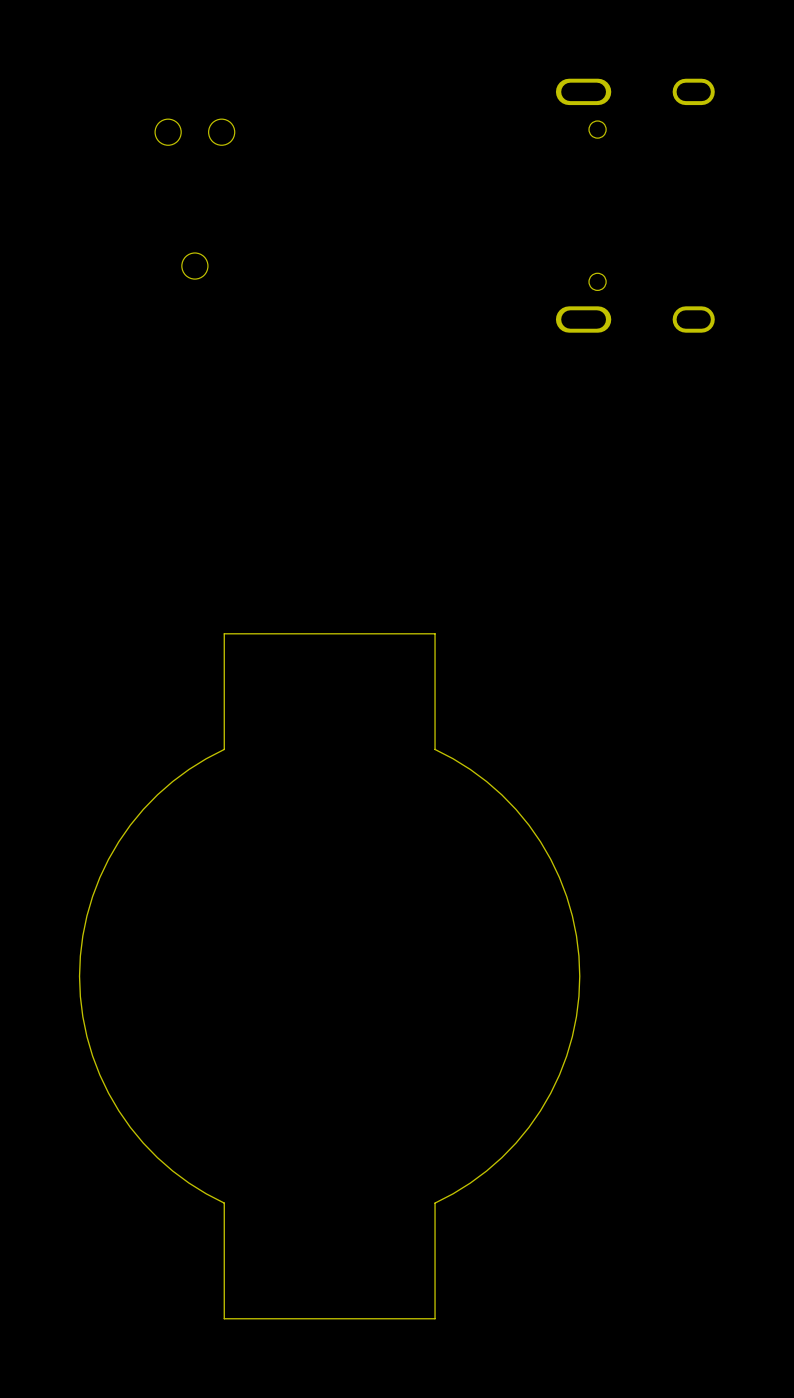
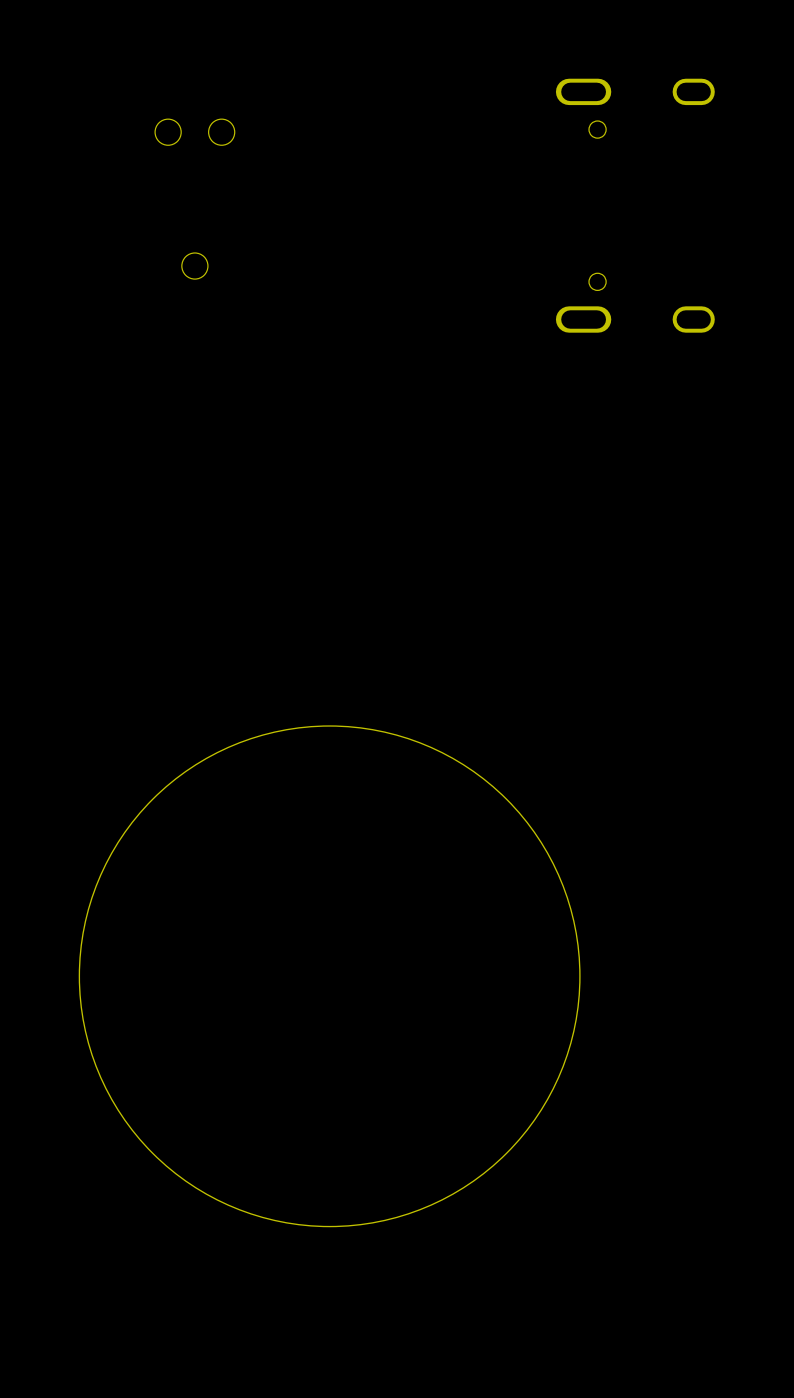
board edge: (435, 633) (435, 749) (470, 769) (486, 781) (515, 809) (540, 841) (559, 877) (566, 896) (576, 935) (579, 976) (576, 1016) (566, 1056) (559, 1074) (540, 1110) (515, 1143) (501, 1157) (470, 1183) (435, 1203) (435, 1318) (224, 1318) (224, 1203) (189, 1183) (172, 1171) (143, 1143) (118, 1110) (108, 1093) (92, 1056) (82, 1016) (79, 976) (82, 935) (92, 896) (99, 877) (118, 841) (143, 809) (157, 794) (189, 769) (224, 749) (224, 633) (435, 633) -> none
round board edge: none -> [78, 725, 581, 1228]

